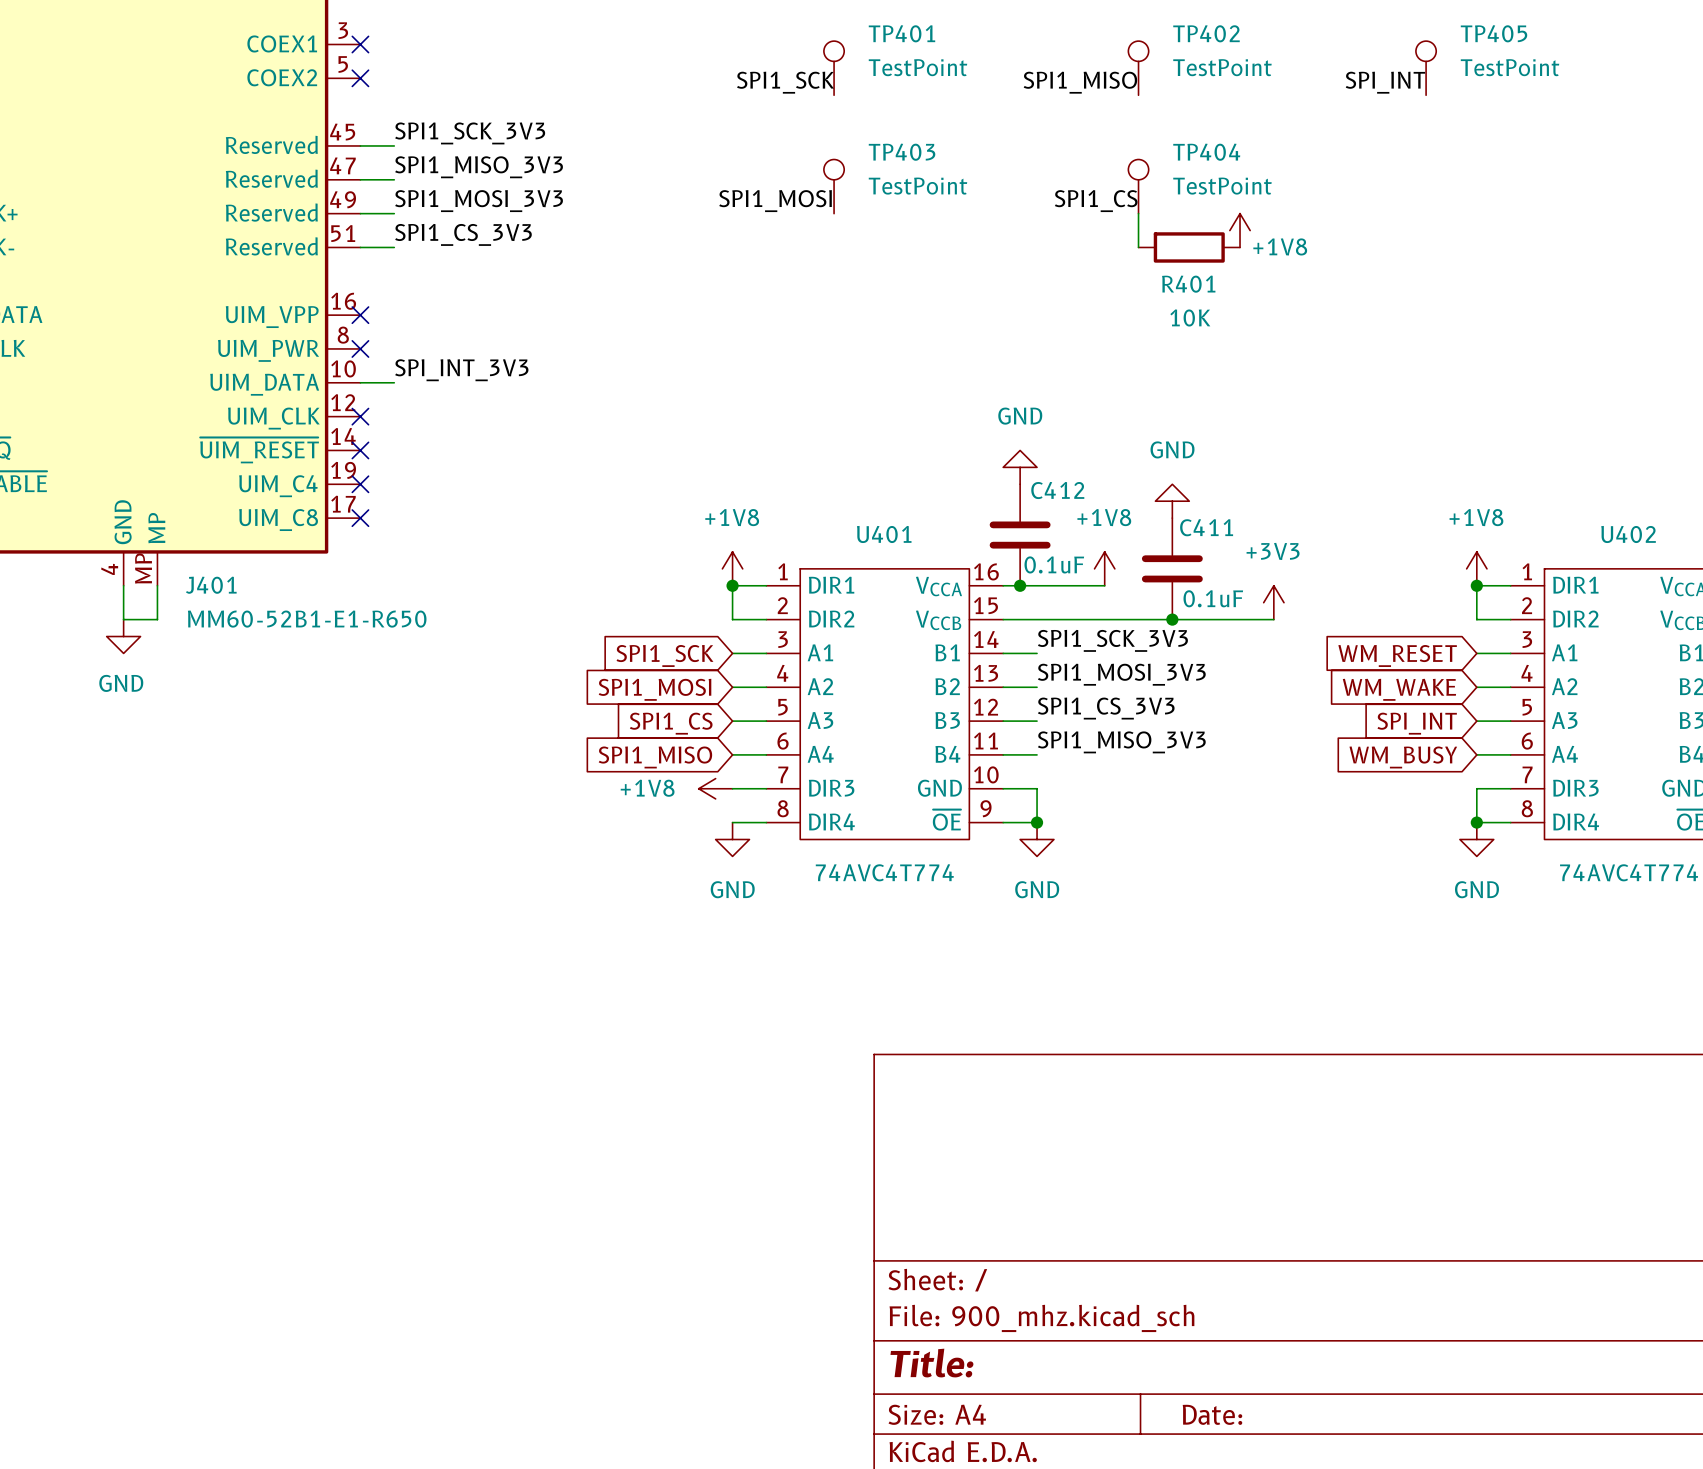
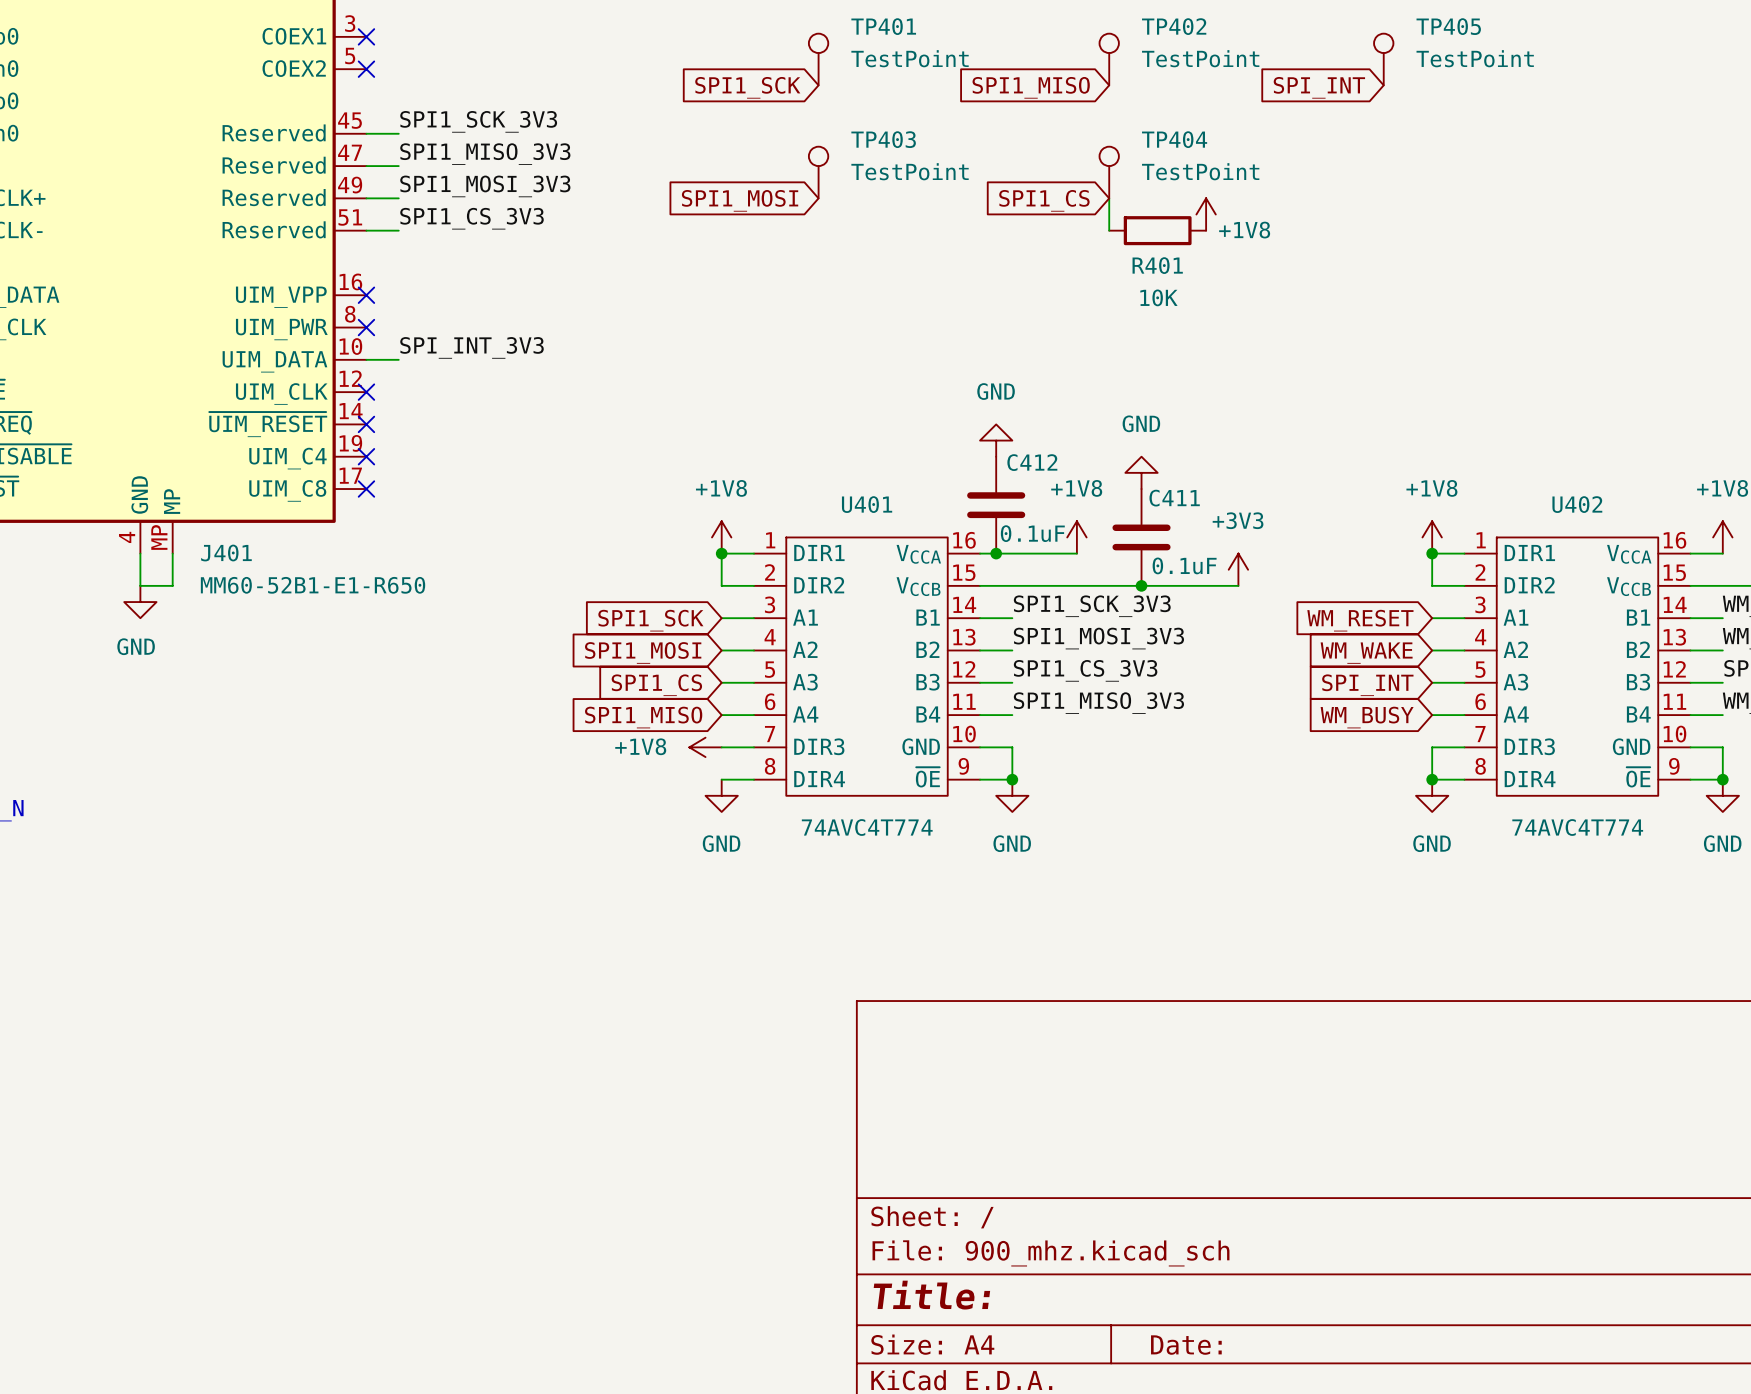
label: SPI1_SCK (785, 82) -> none
label: SPI1_MISO (1080, 82) -> none
label: SPI_INT (1385, 82) -> none
global label: none -> SPI1_SCK (747, 87)
global label: none -> SPI1_MISO (1031, 87)
global label: none -> SPI_INT (1319, 87)
label: SPI1_MOSI (775, 201) -> none
label: SPI1_CS (1096, 201) -> none
global label: none -> SPI1_MOSI (740, 200)
global label: none -> SPI1_CS (1044, 200)

